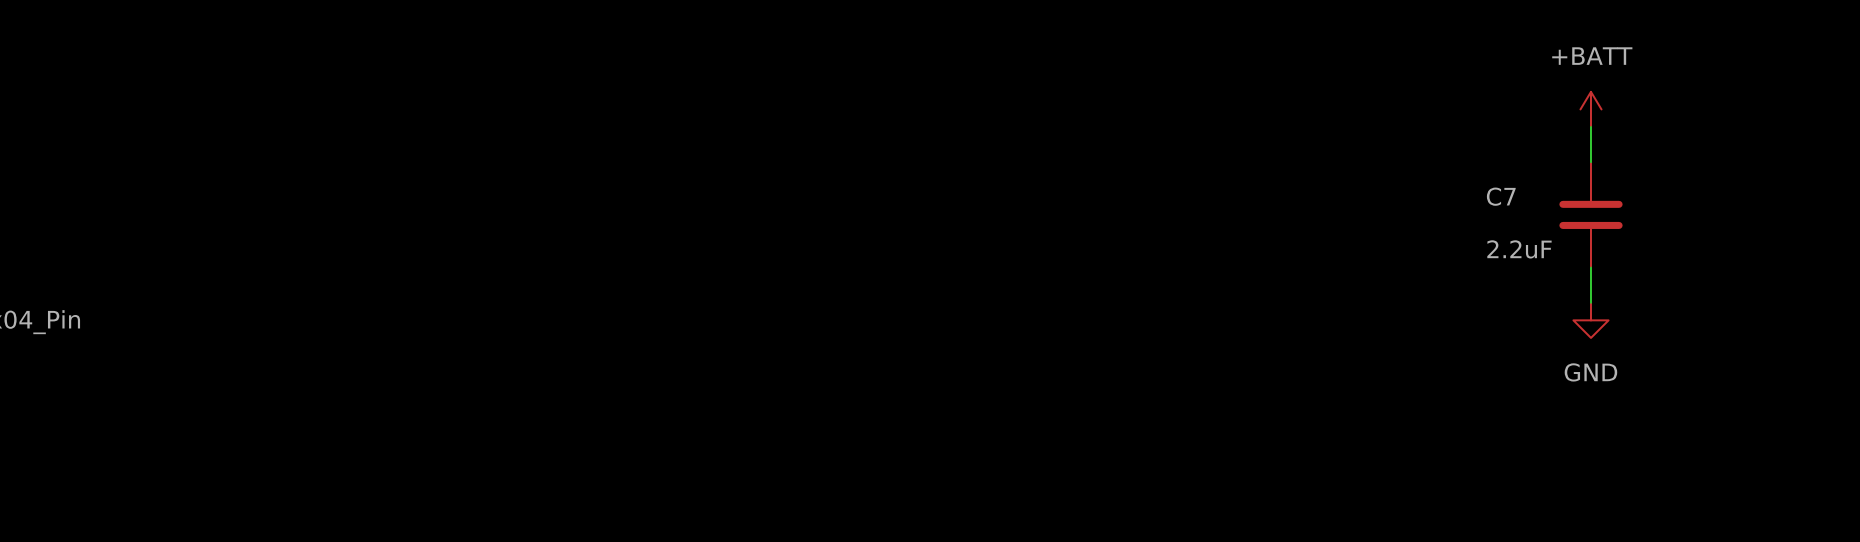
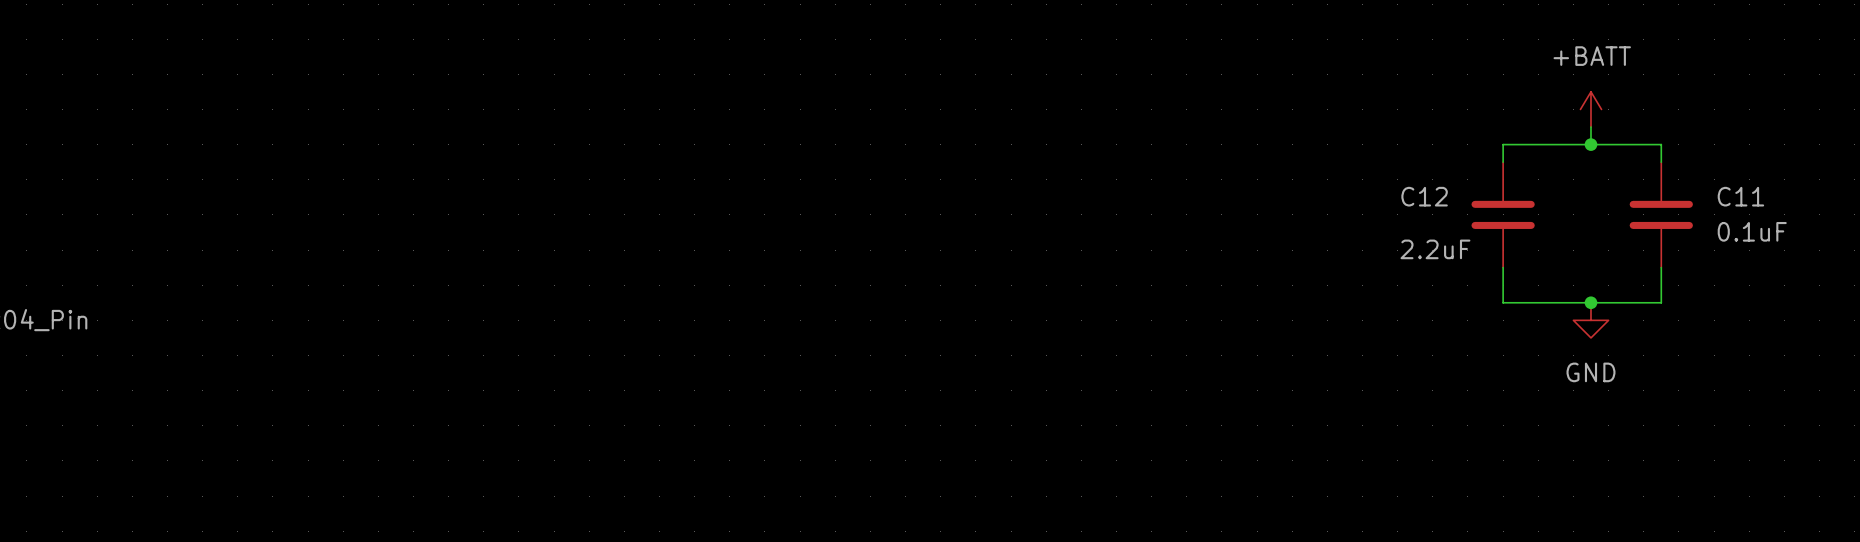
wire: (1590, 144) (1590, 162) -> none
junction: none -> (1590, 144)
wire: none -> (1503, 162) (1503, 144) (1661, 144) (1661, 162)
C12: none -> 2.2uF (1503, 214)
C7: 2.2uF (1590, 214) -> none
C11: none -> 0.1uF (1661, 214)
wire: none -> (1503, 267) (1503, 302) (1661, 302) (1661, 267)
wire: (1590, 267) (1590, 302) -> none
junction: none -> (1590, 302)

